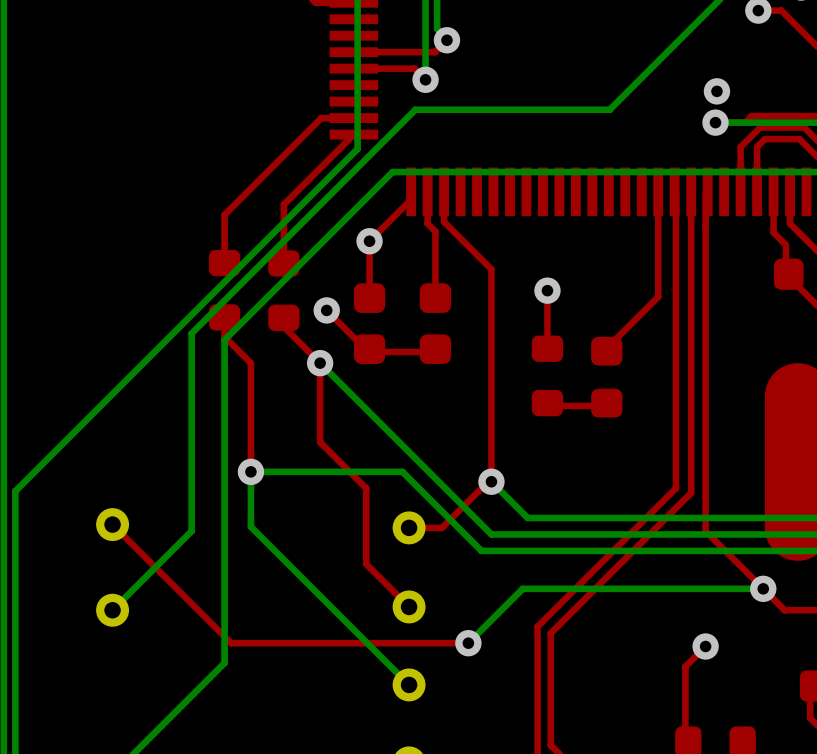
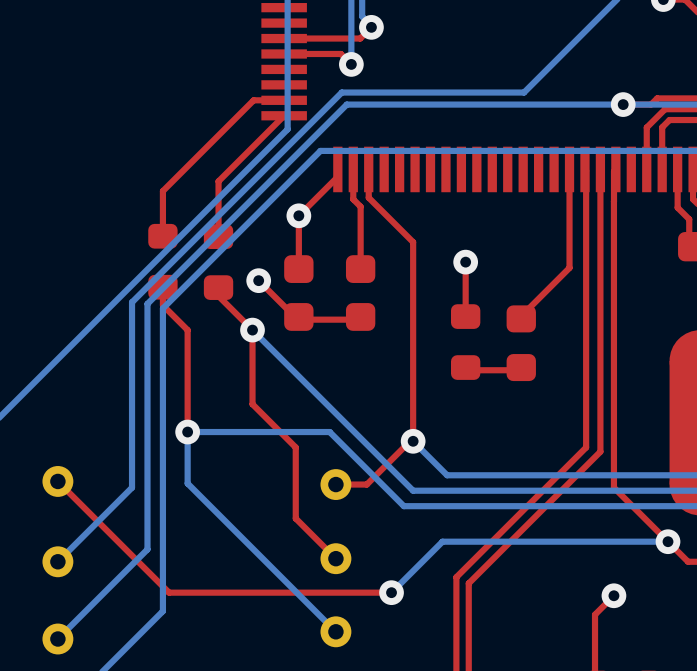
via: (716, 91) -> none
bottom track: none -> (623, 104) (346, 104) (147, 303) (147, 549) (57, 639)
part: none -> (57, 639)

